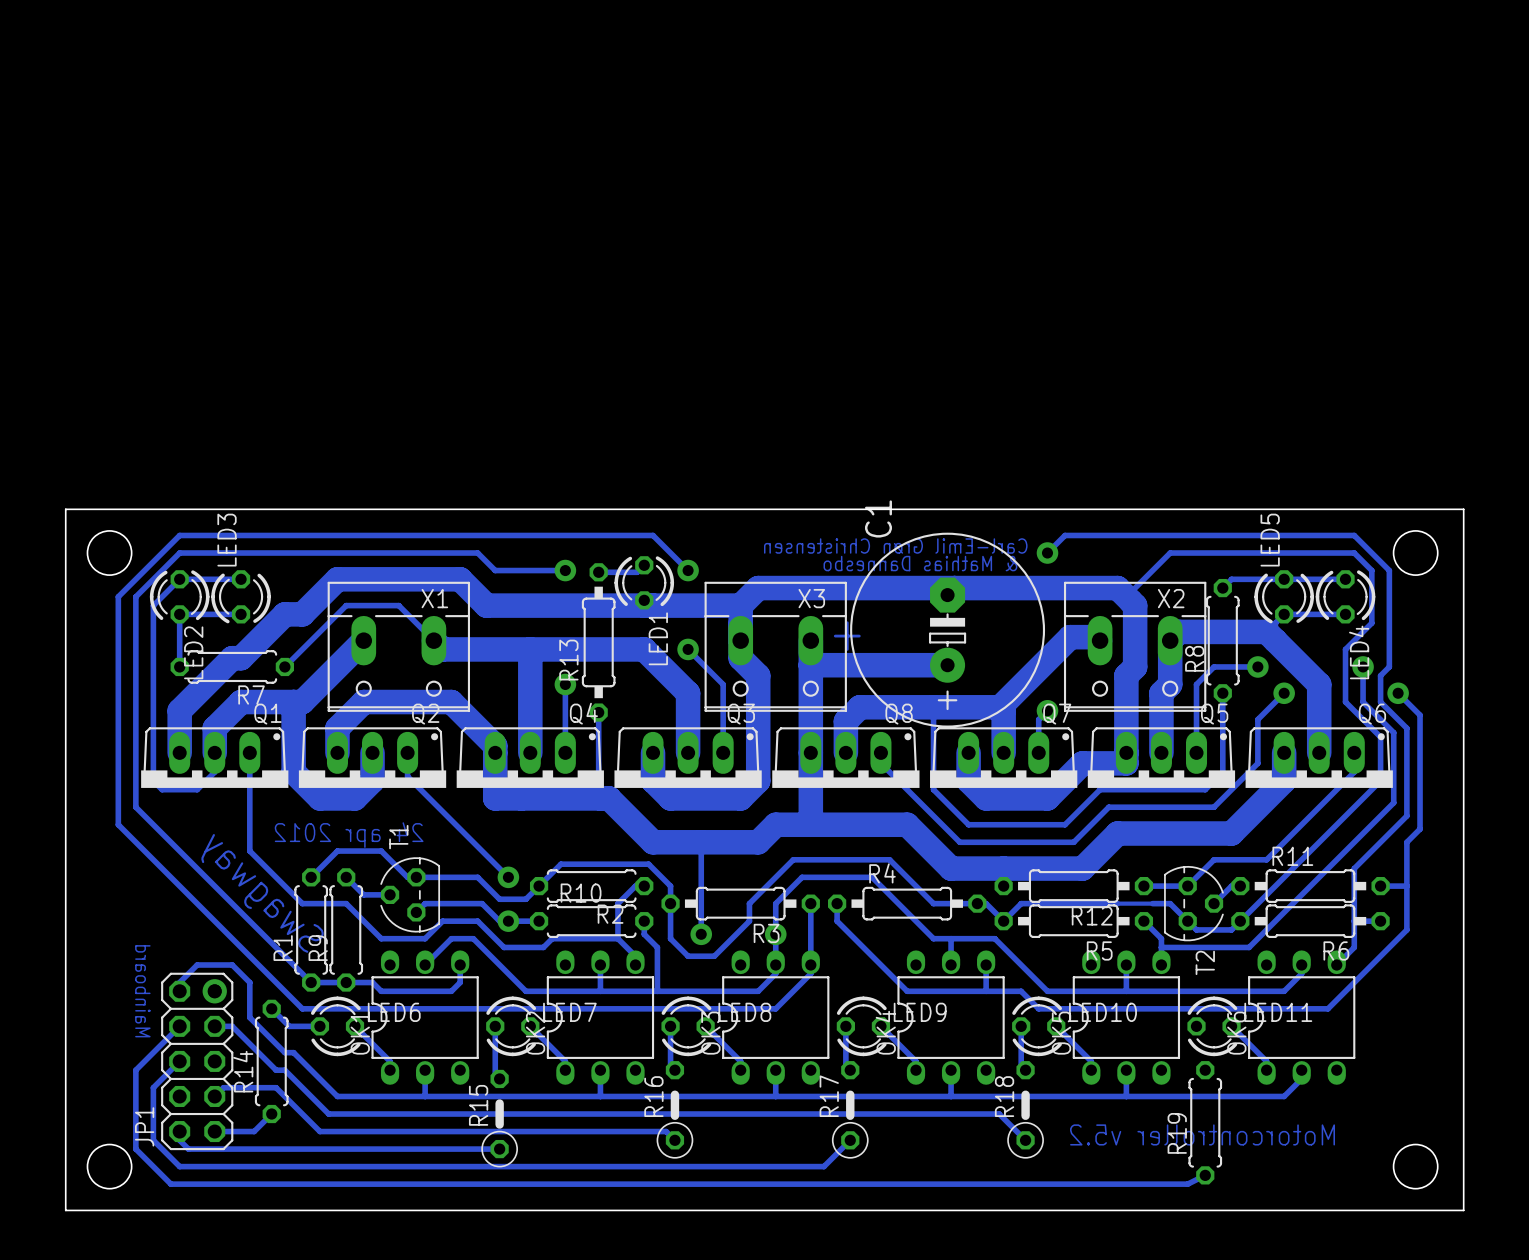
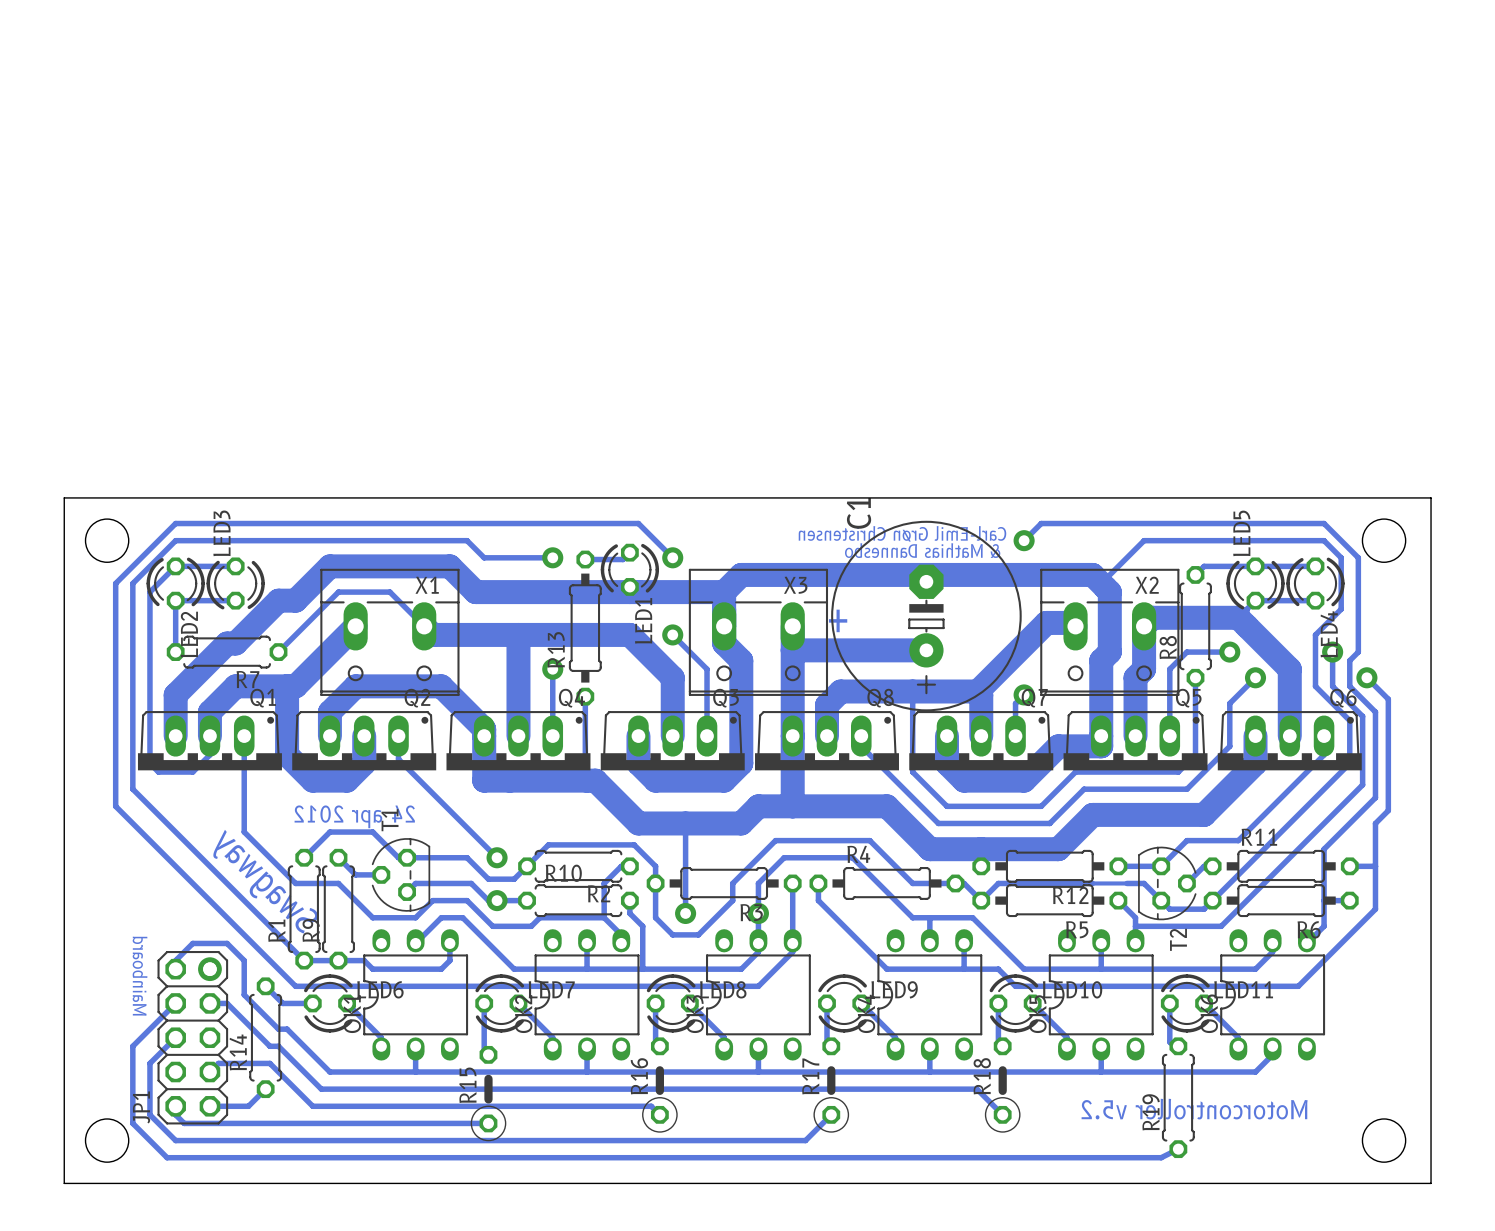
bottom track: none -> (1169, 1003) (1169, 1042) (1174, 1046)

